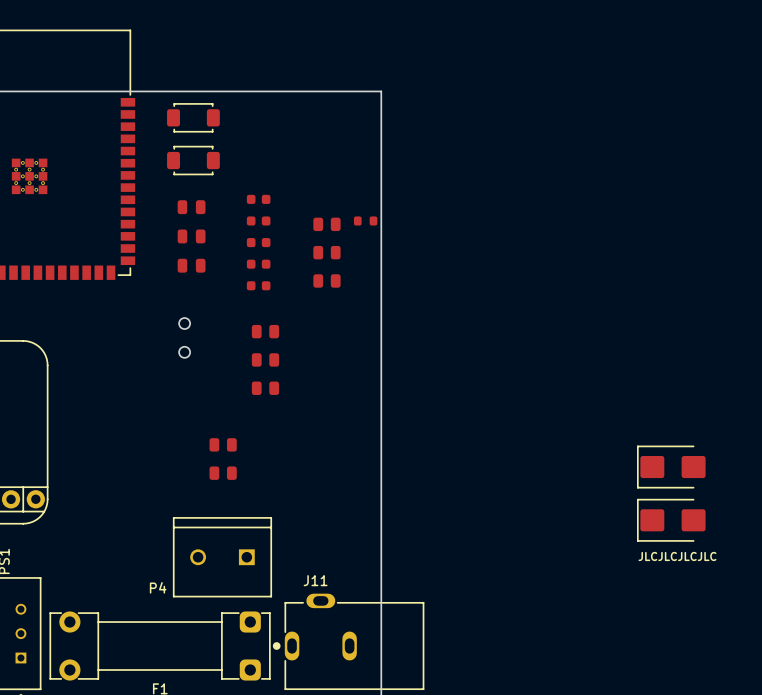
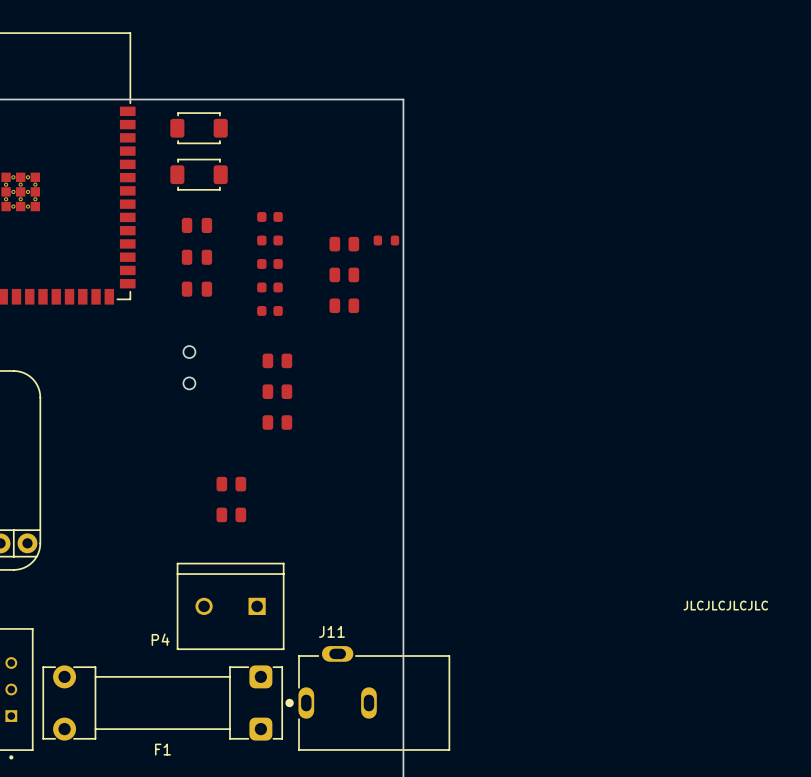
part: (671, 467) -> none
part: (671, 520) -> none

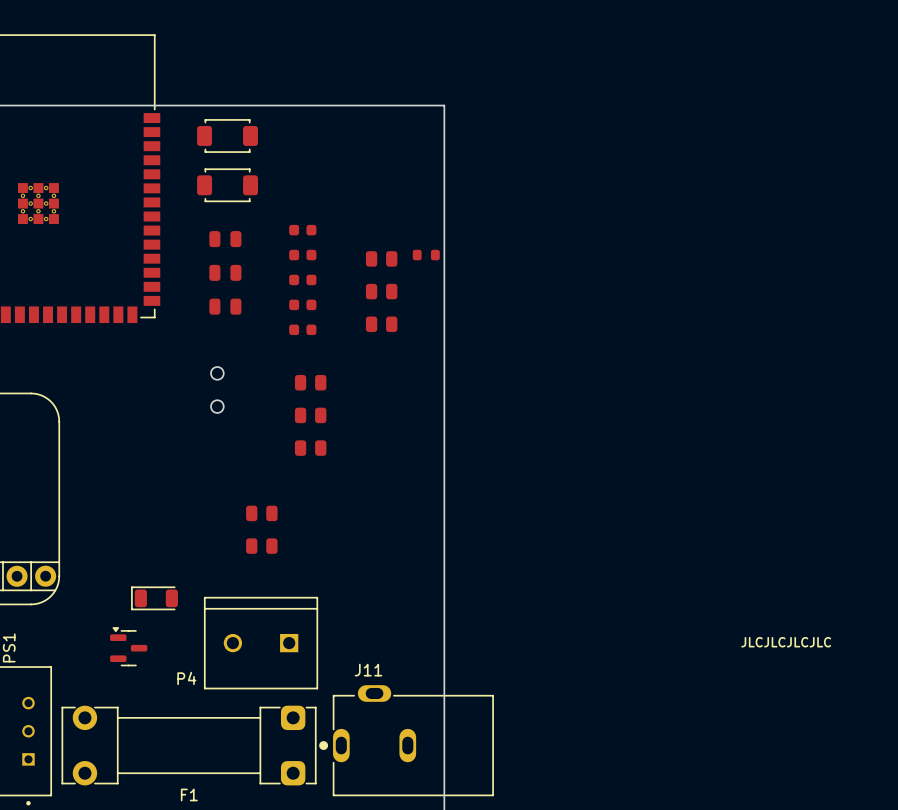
part: none -> (154, 598)
part: none -> (128, 646)

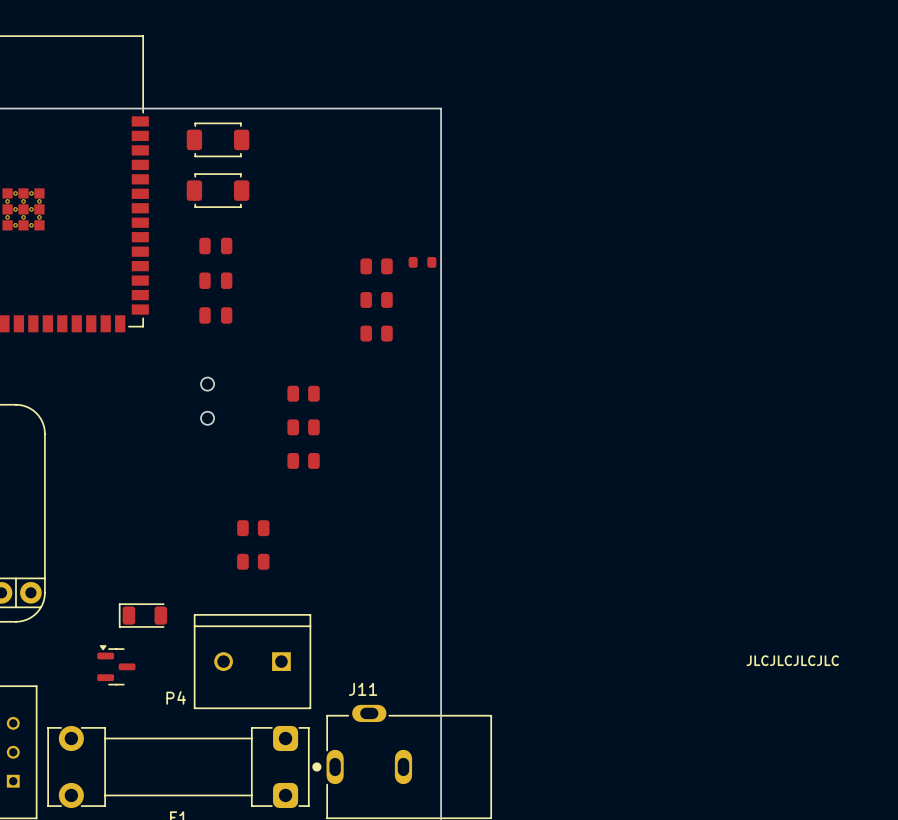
part: (302, 230) -> none
part: (302, 255) -> none
part: (302, 279) -> none
part: (302, 304) -> none
part: (302, 329) -> none

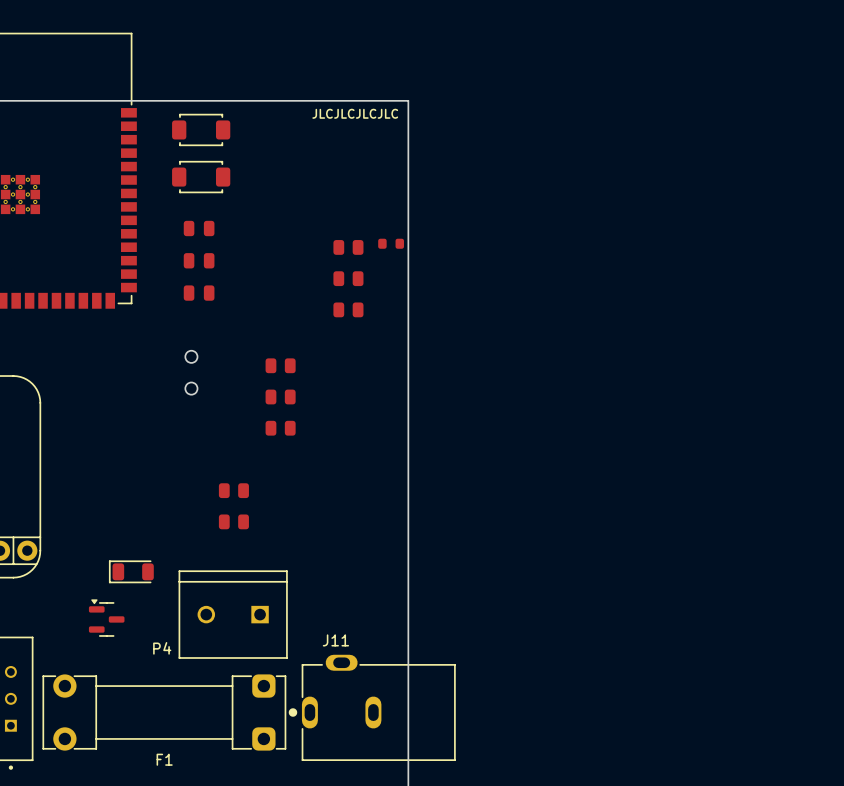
drawing: none -> [312, 108, 399, 119]
drawing: [746, 655, 839, 667] -> none

